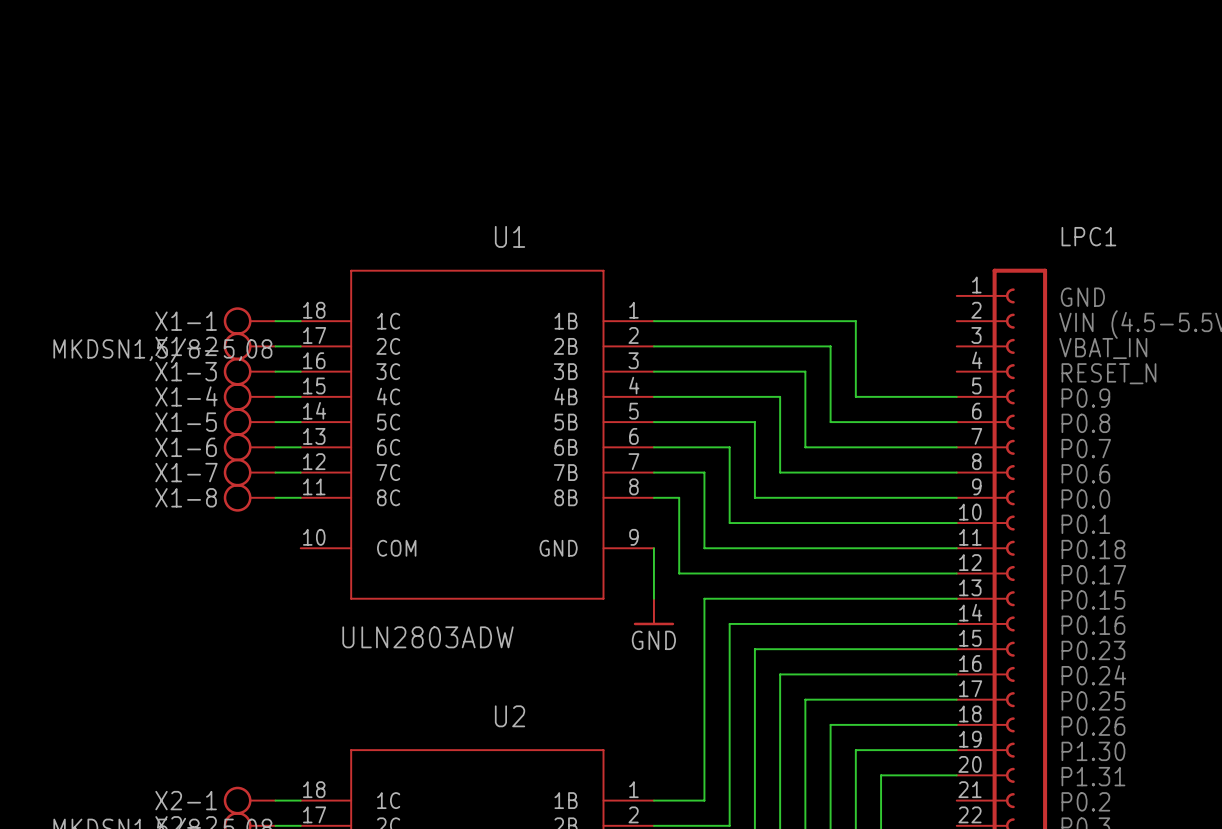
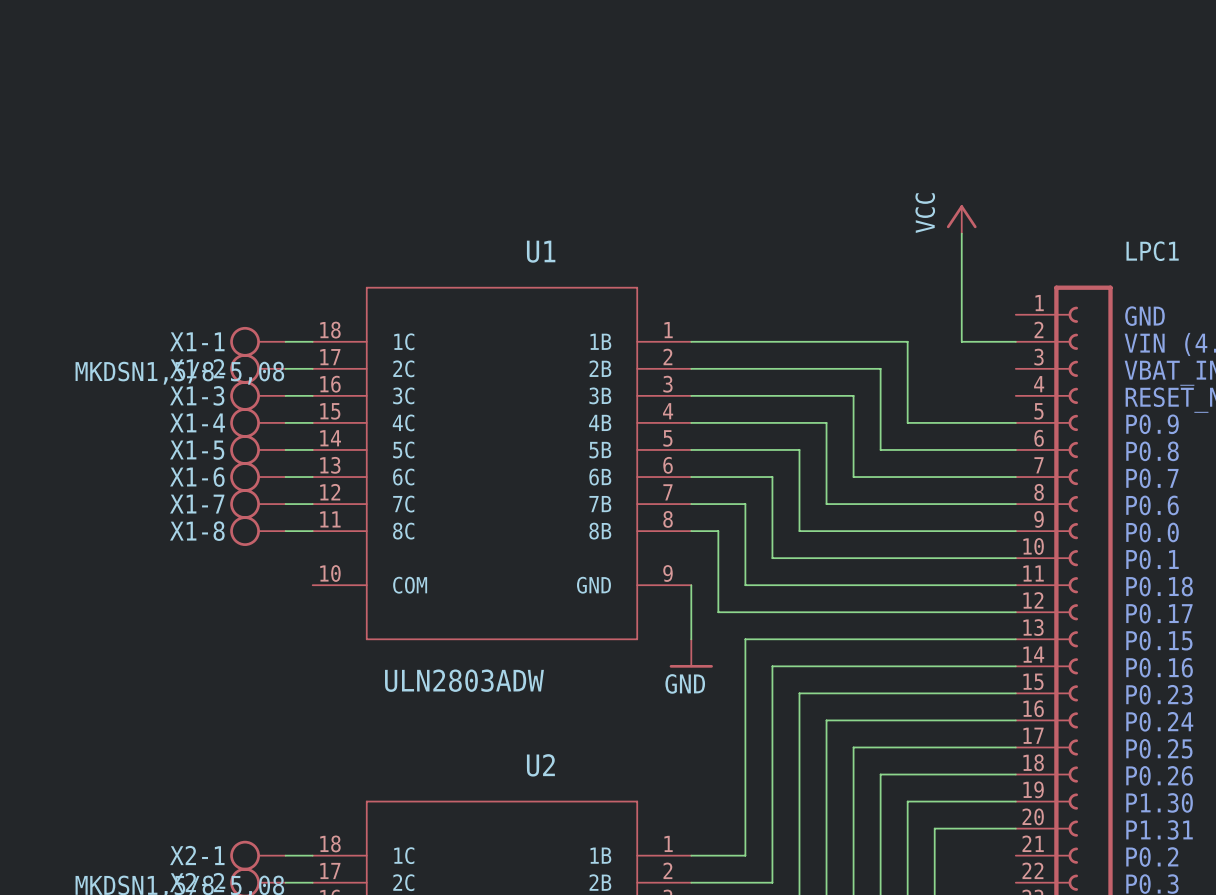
power symbol: none -> VCC (961, 219)
wire: none -> (961, 233) (961, 341) (1015, 341)

